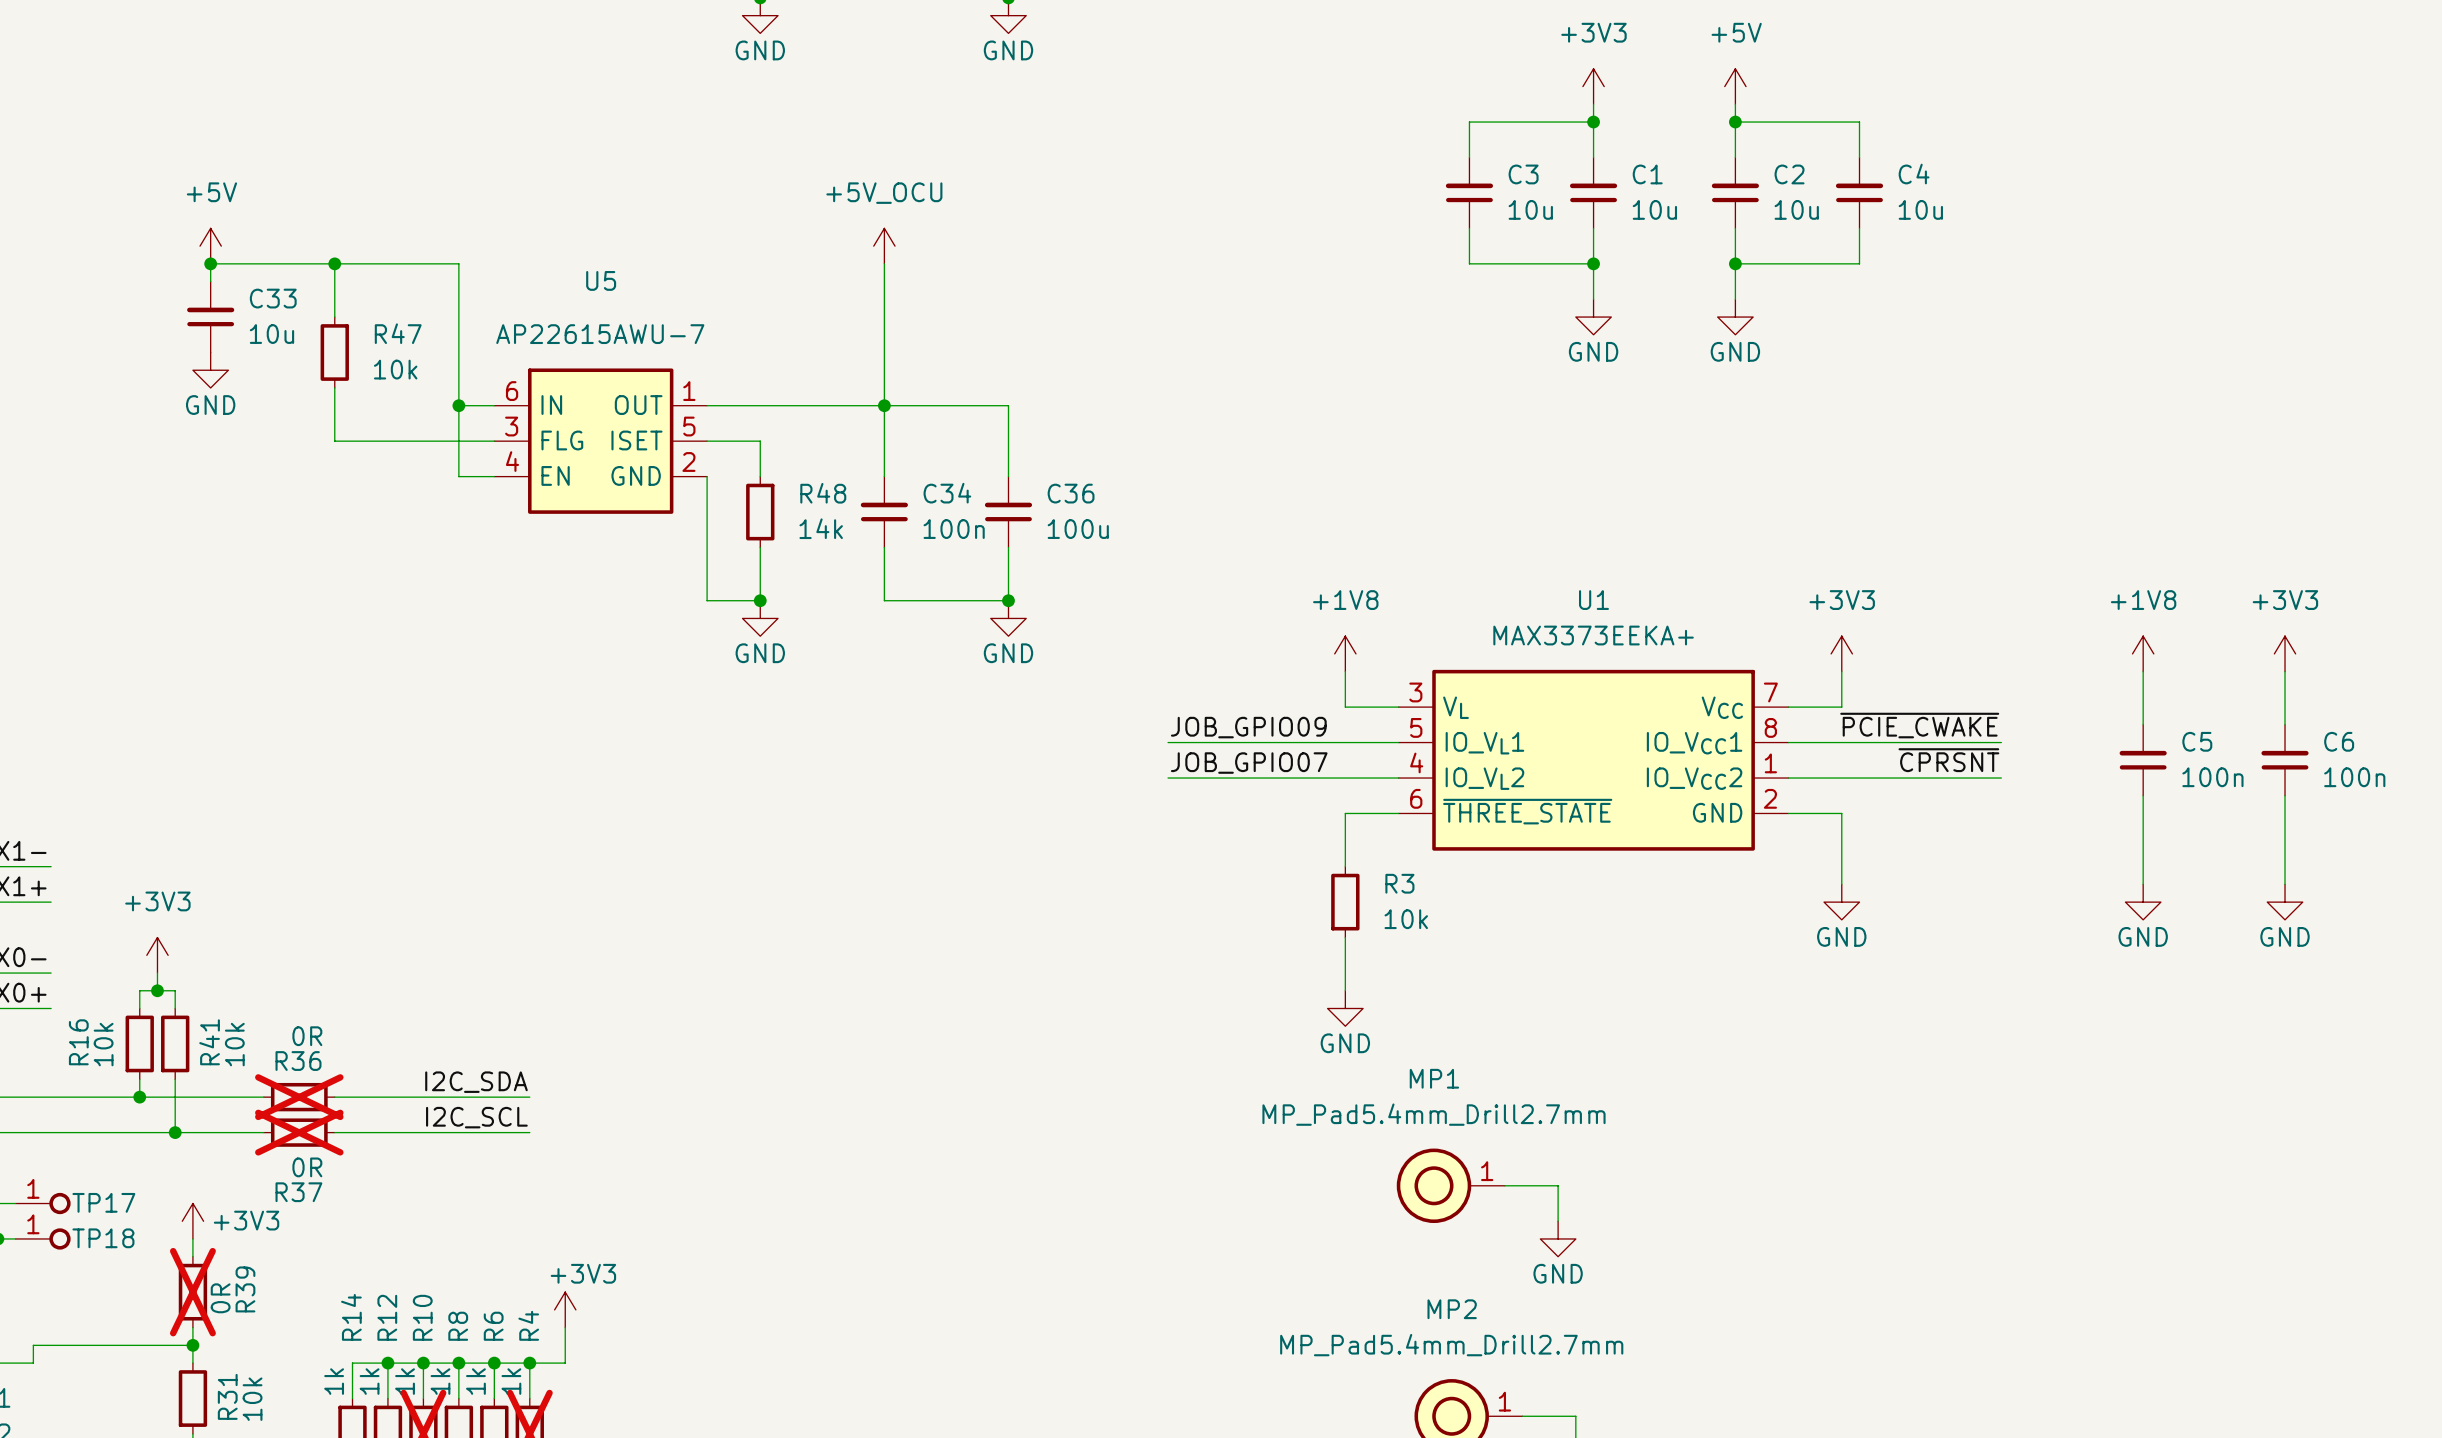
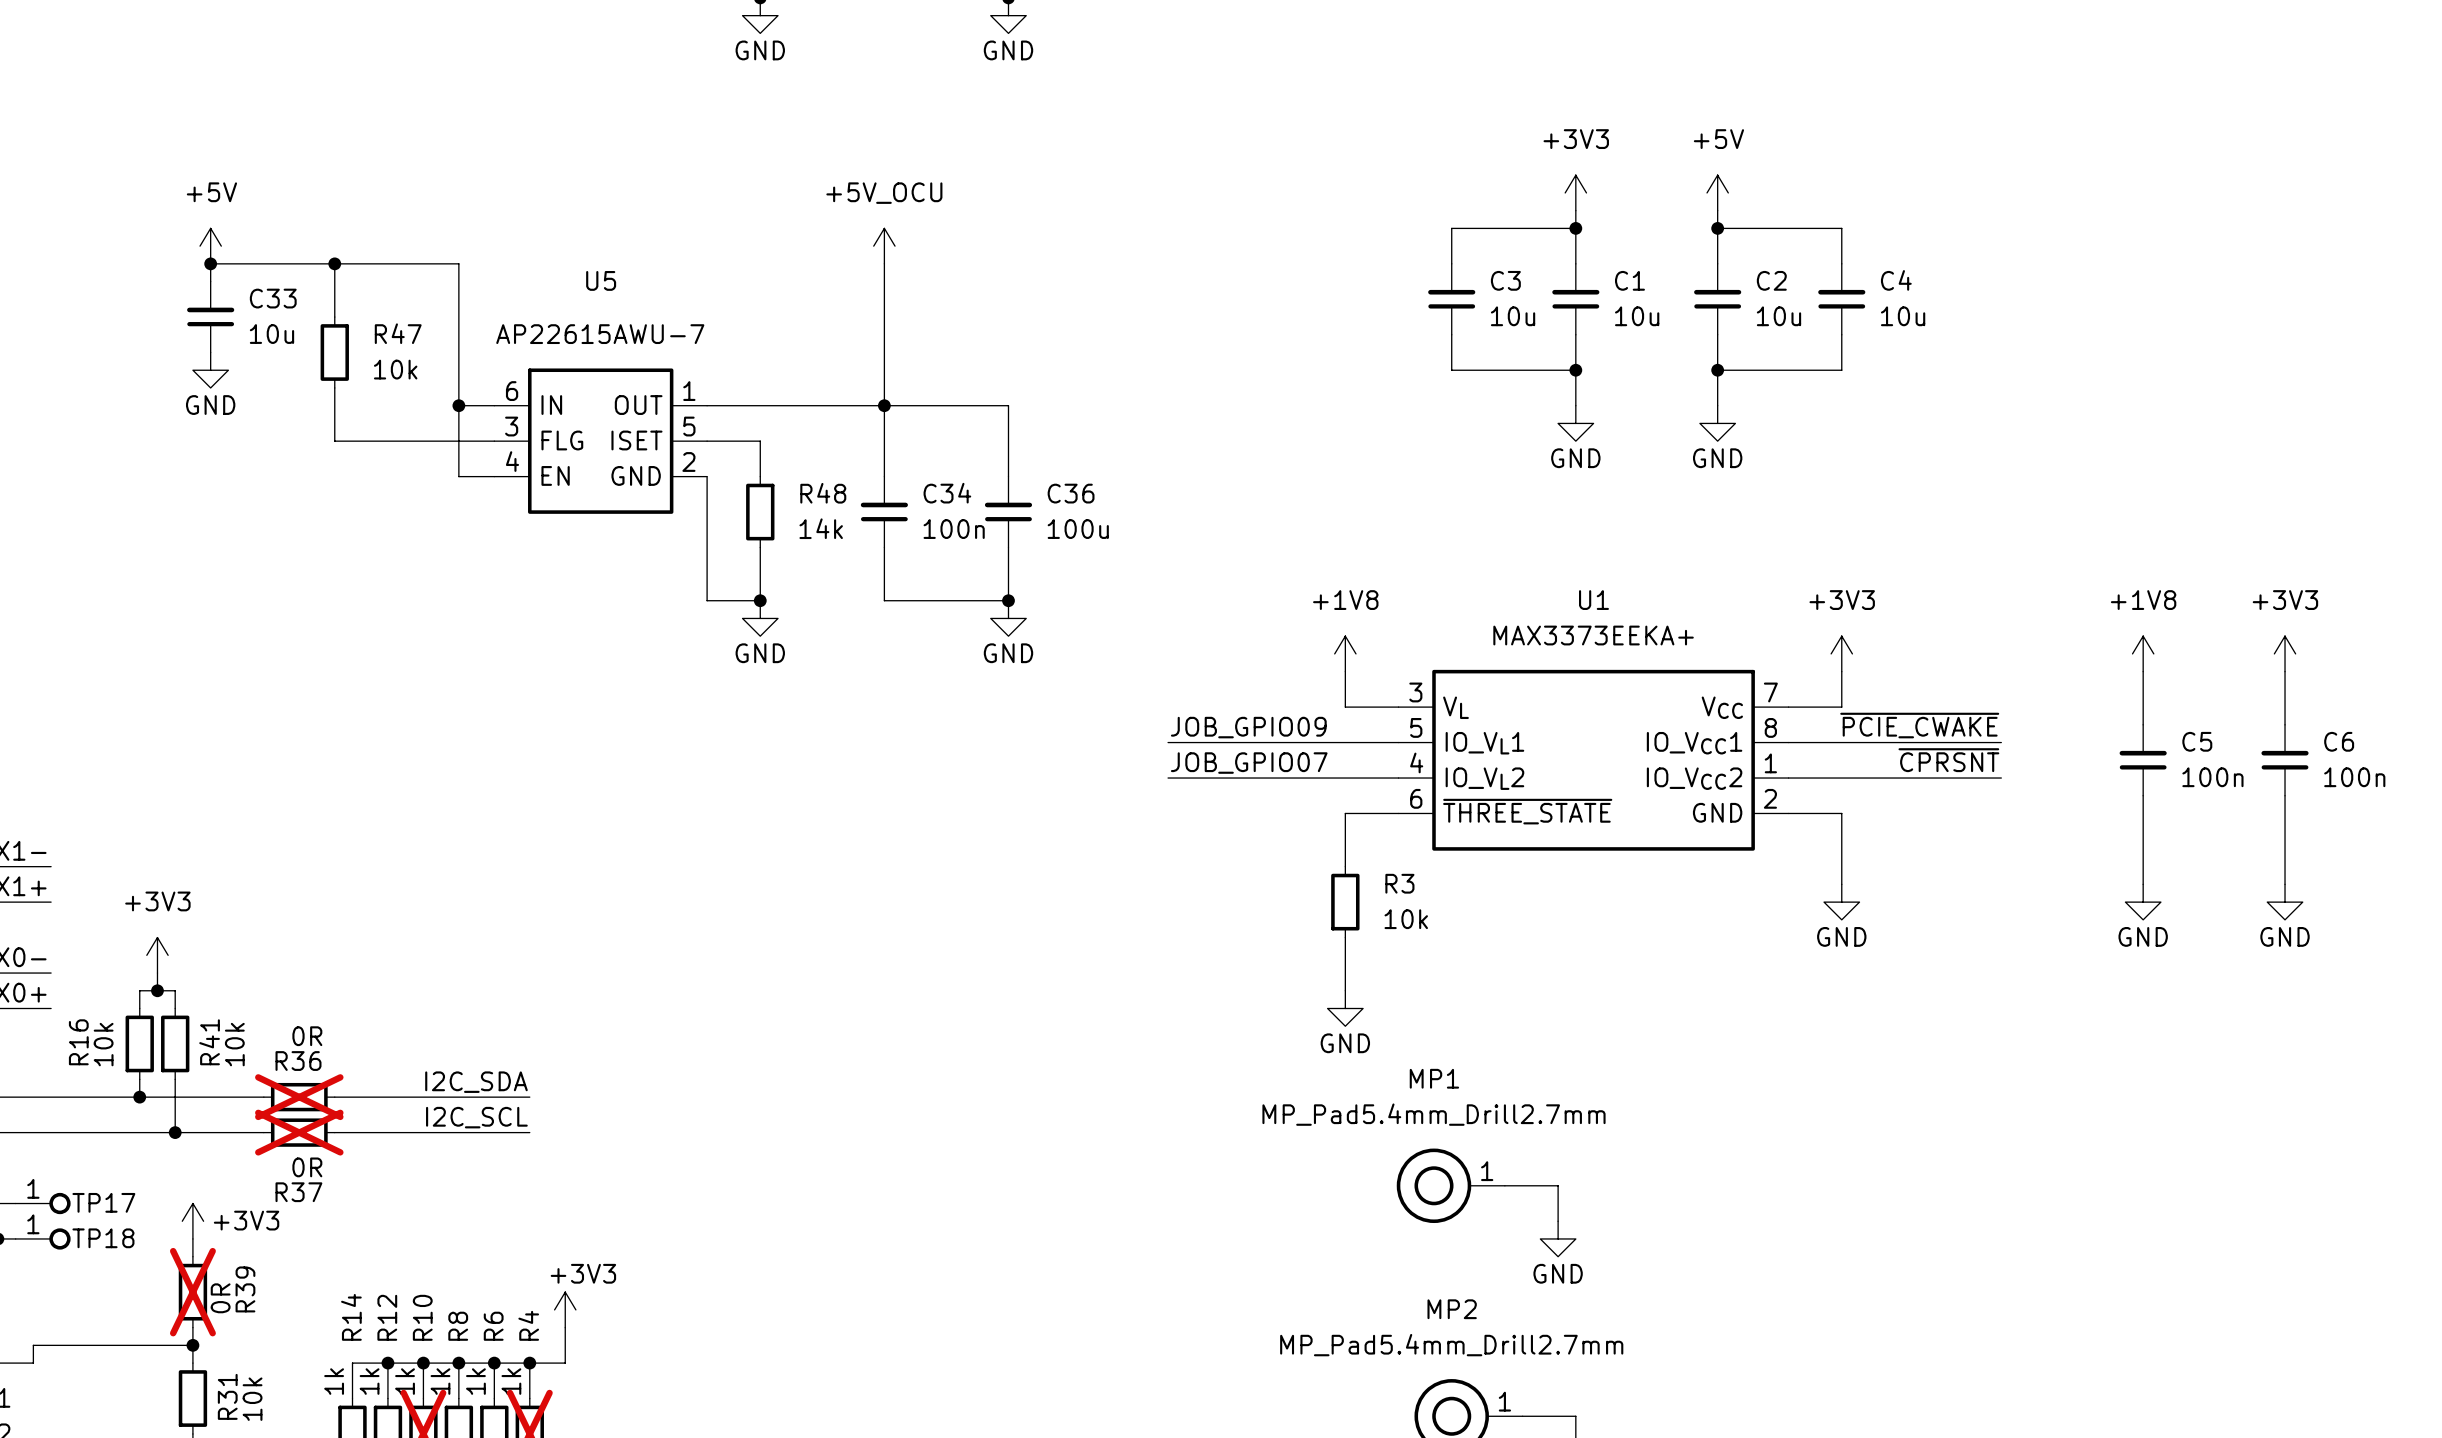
power symbol position: +3V3 (1593, 86) -> +3V3 (1575, 192)
power symbol position: +5V (1735, 86) -> +5V (1717, 192)
wire: (1593, 104) (1593, 157) -> (1575, 210) (1575, 263)
wire: (1735, 104) (1735, 157) -> (1717, 210) (1717, 263)
wire: (1593, 122) (1469, 122) (1469, 157) -> (1575, 228) (1451, 228) (1451, 263)
junction: (1593, 122) -> none
wire: (1735, 122) (1859, 122) (1859, 157) -> (1717, 228) (1841, 228) (1841, 263)
junction: (1735, 122) -> none
C3 position: (1469, 192) -> (1451, 299)
C1 position: (1593, 192) -> (1575, 299)
C2 position: (1735, 192) -> (1717, 299)
C4 position: (1859, 192) -> (1841, 299)
wire: (1469, 228) (1469, 263) (1593, 263) -> (1451, 334) (1451, 370) (1575, 370)
wire: (1593, 228) (1593, 299) -> (1575, 334) (1575, 405)
wire: (1735, 228) (1735, 299) -> (1717, 334) (1717, 405)
wire: (1859, 228) (1859, 263) (1735, 263) -> (1841, 334) (1841, 370) (1717, 370)
junction position: (1593, 263) -> (1575, 228)
junction position: (1735, 263) -> (1717, 228)
power symbol: GND (1593, 317) -> none
power symbol: GND (1735, 317) -> none
junction: none -> (1575, 370)
junction: none -> (1717, 370)
power symbol: none -> GND (1575, 423)
power symbol: none -> GND (1717, 423)

